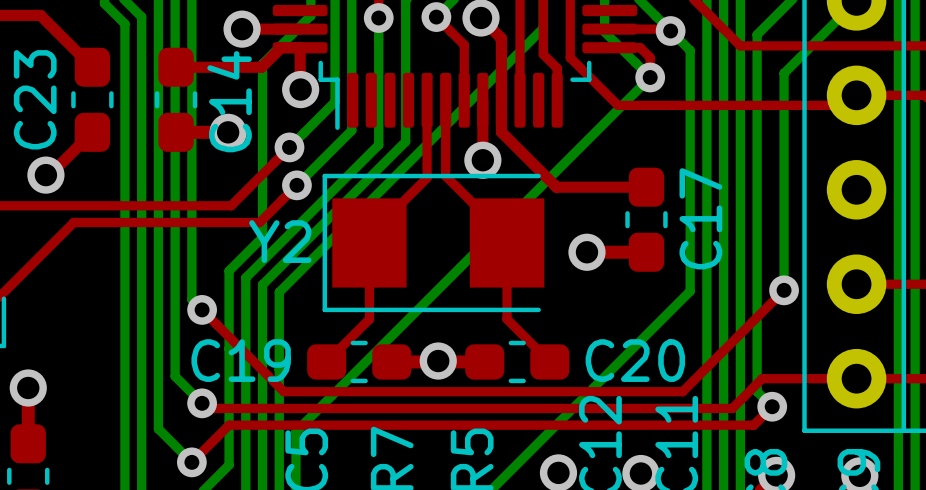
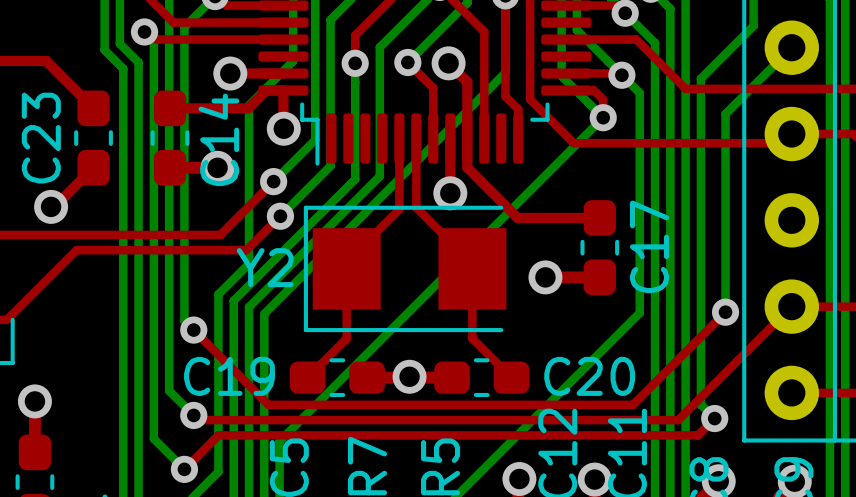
top track: (762, 378) (856, 378) -> (705, 392) (791, 306)

